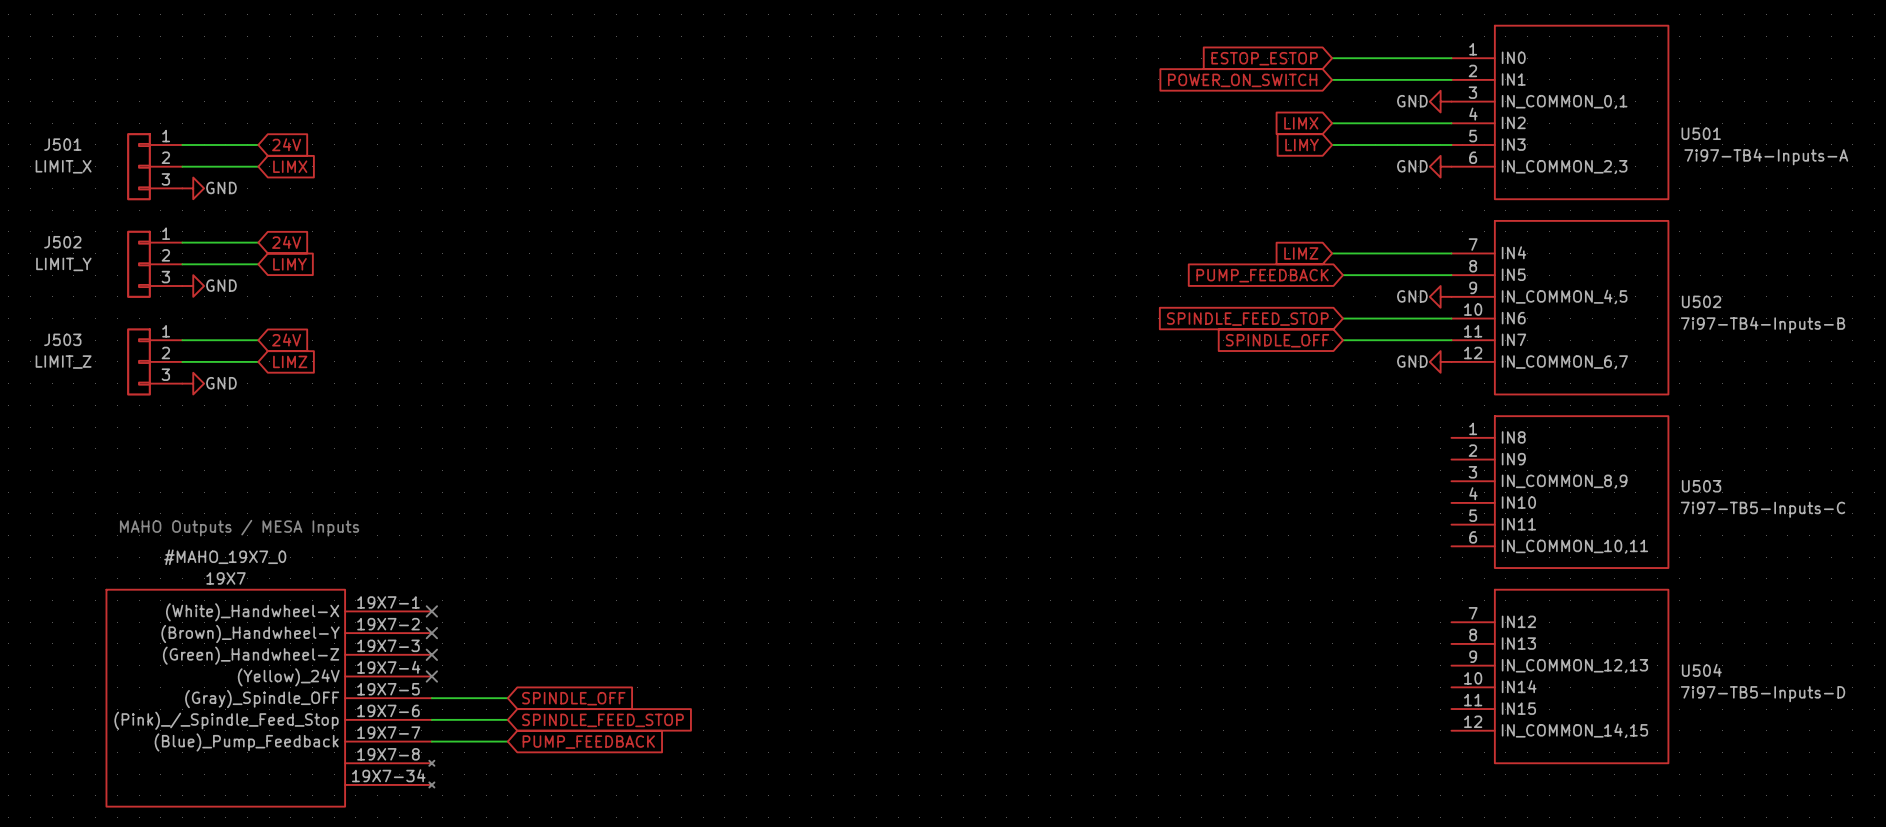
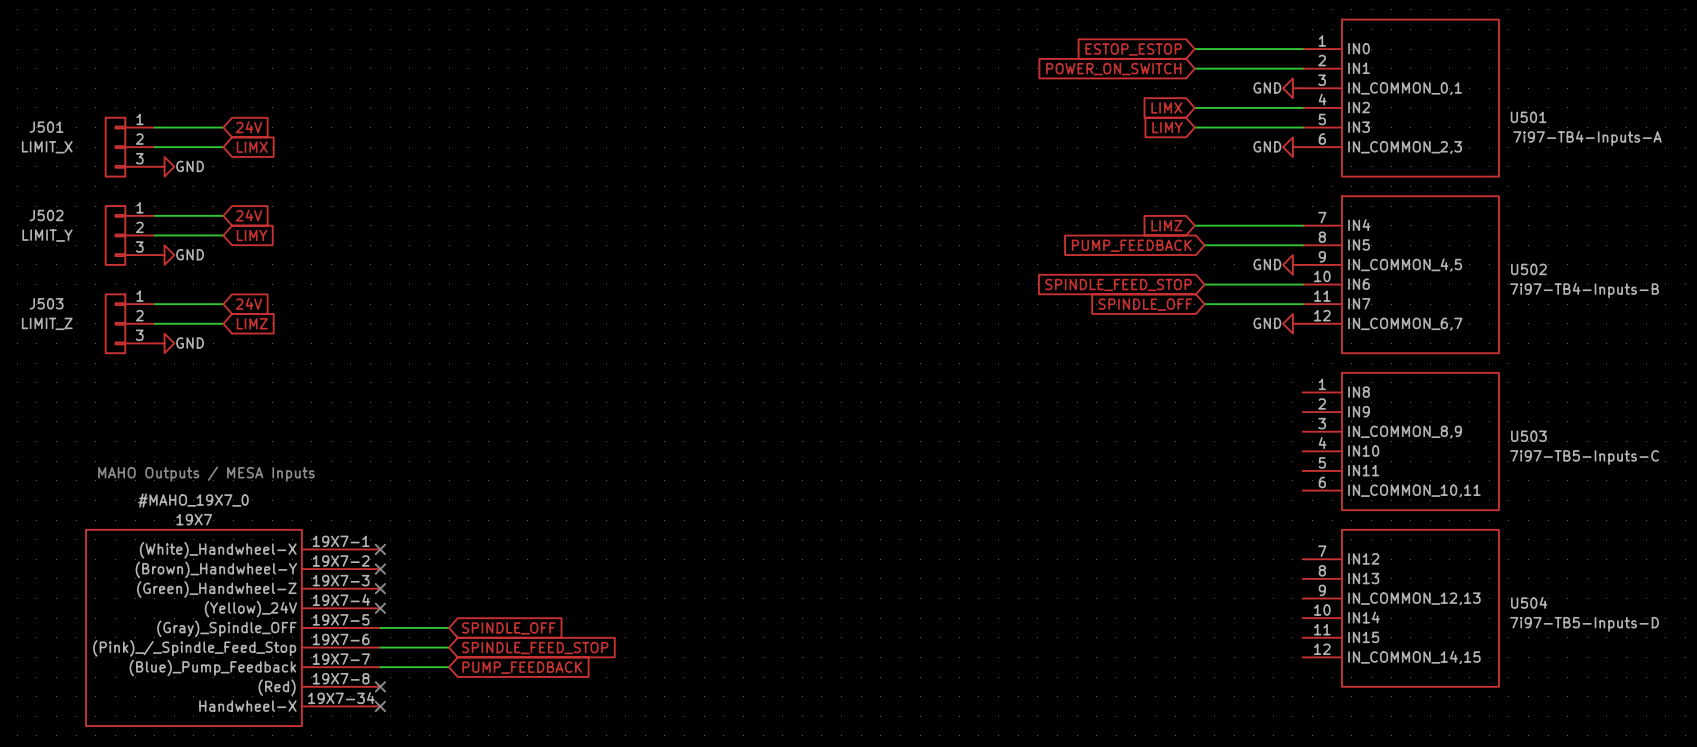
#MAHO_19X7_0 shape: [105, 589, 435, 808] -> [85, 529, 381, 727]
no-connect mark: none -> (380, 686)
no-connect mark: none -> (380, 706)

